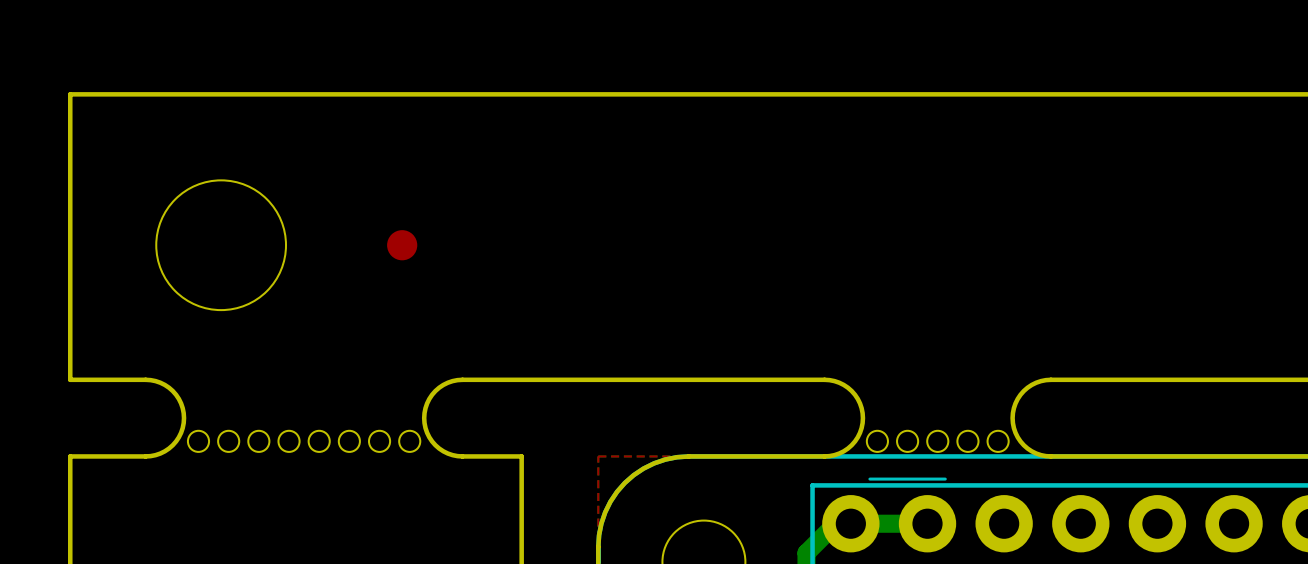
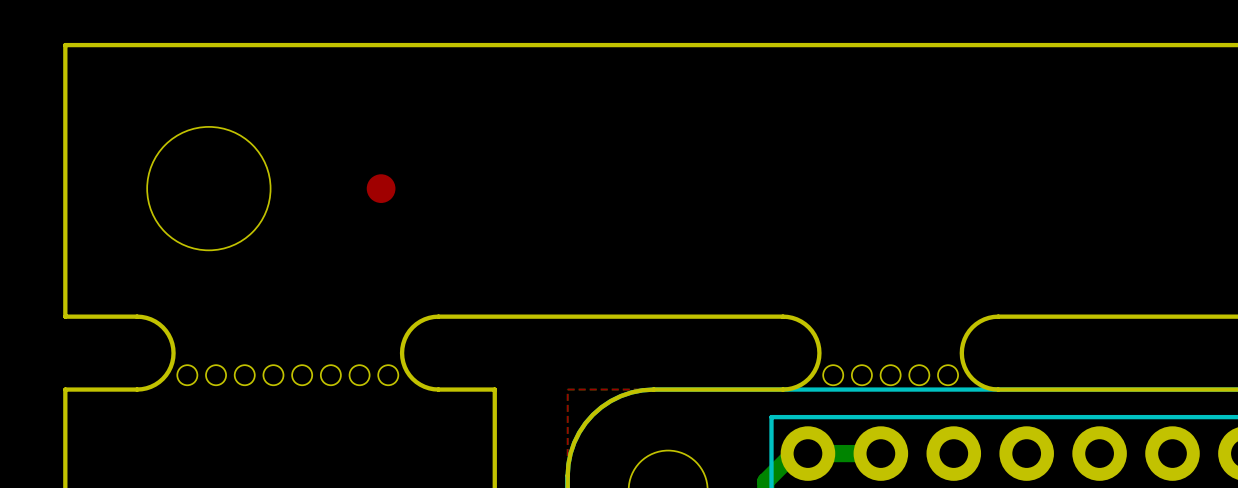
line: (869, 479) (945, 479) -> none

